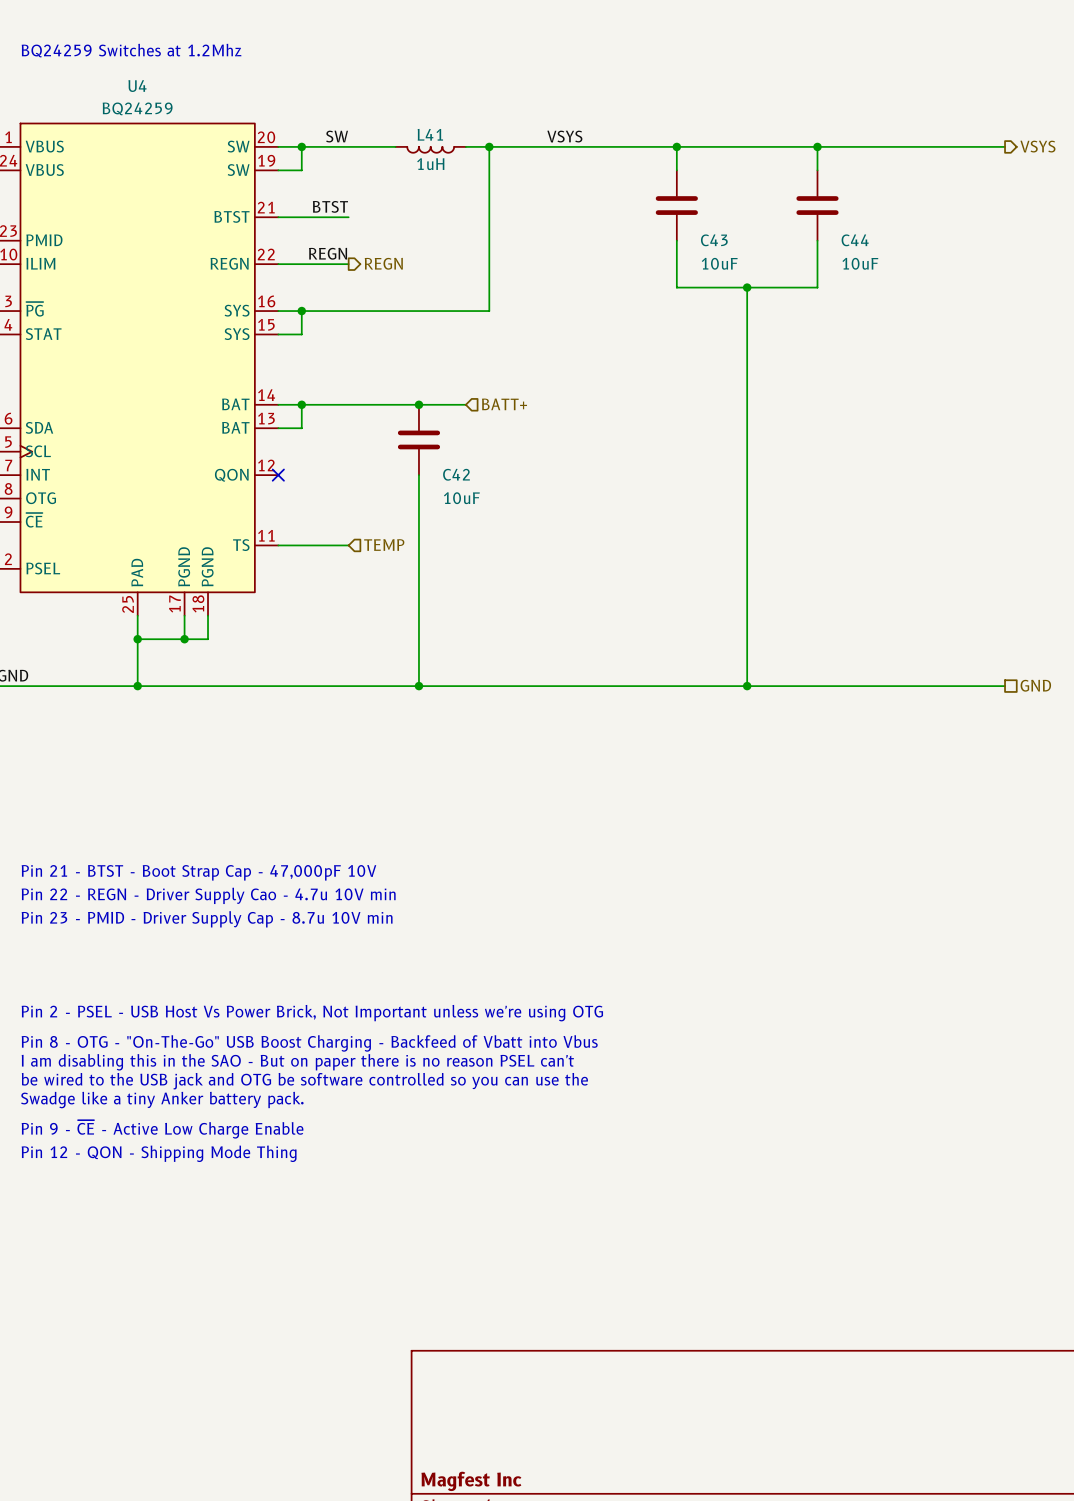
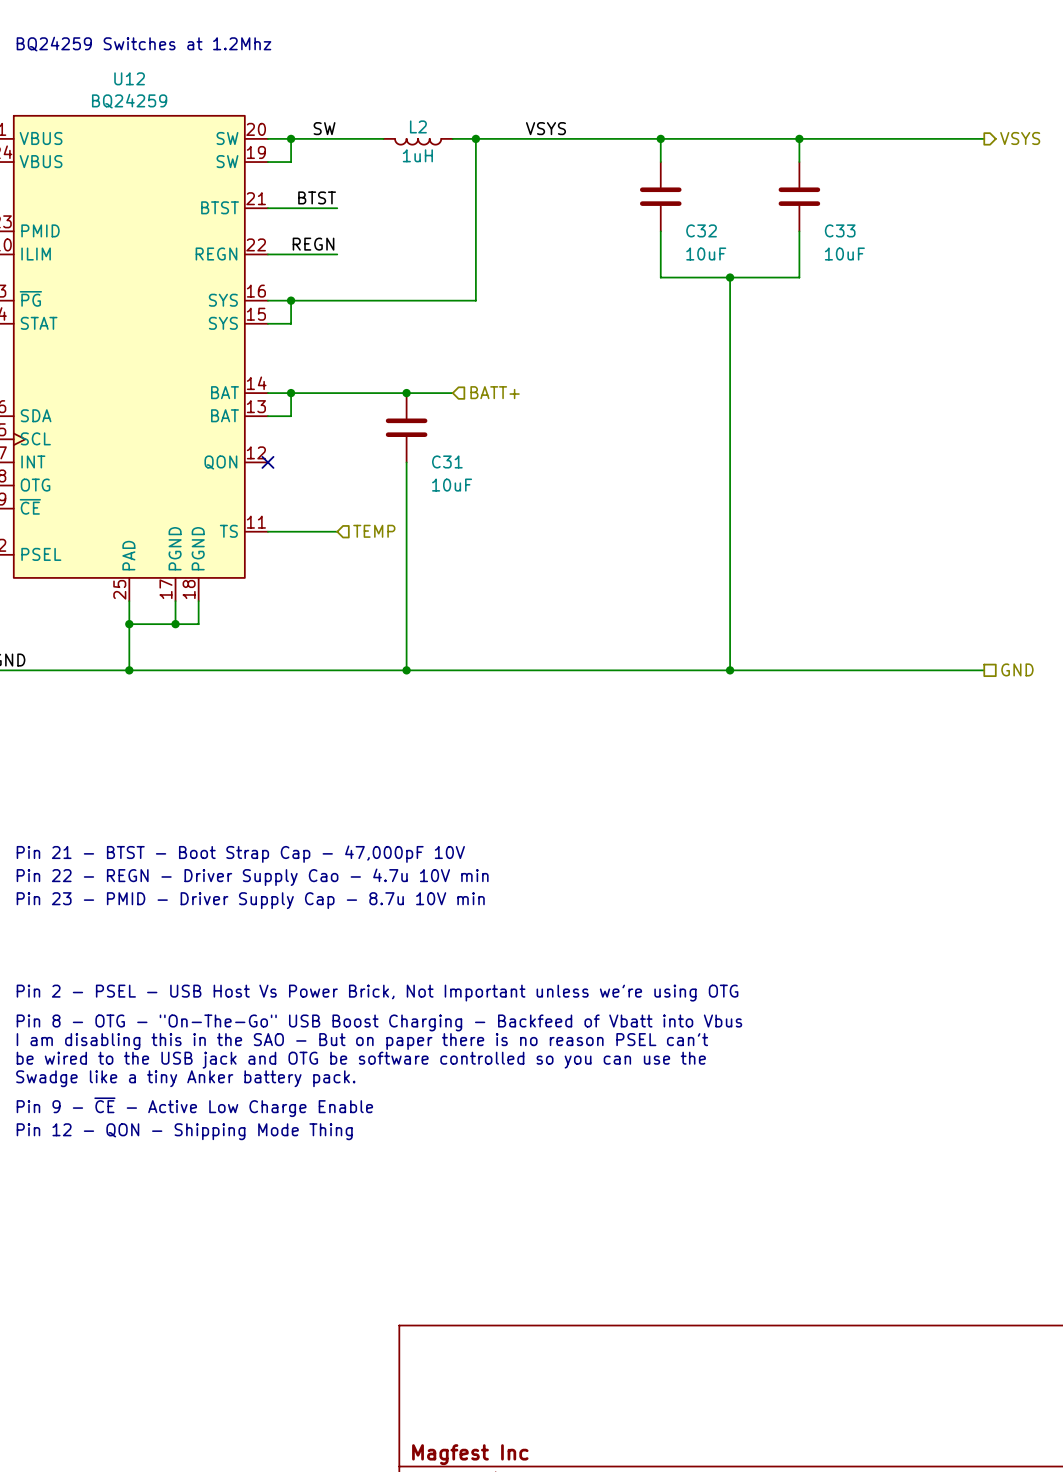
U4 name: U4 (137, 86) -> U12 (129, 78)
L41 name: L41 (430, 134) -> L2 (418, 126)
C43 name: C43 (714, 240) -> C32 (701, 230)
C44 name: C44 (855, 240) -> C33 (840, 230)
hierarchical label: REGN (383, 263) -> none
C42 name: C42 (456, 474) -> C31 (447, 461)

